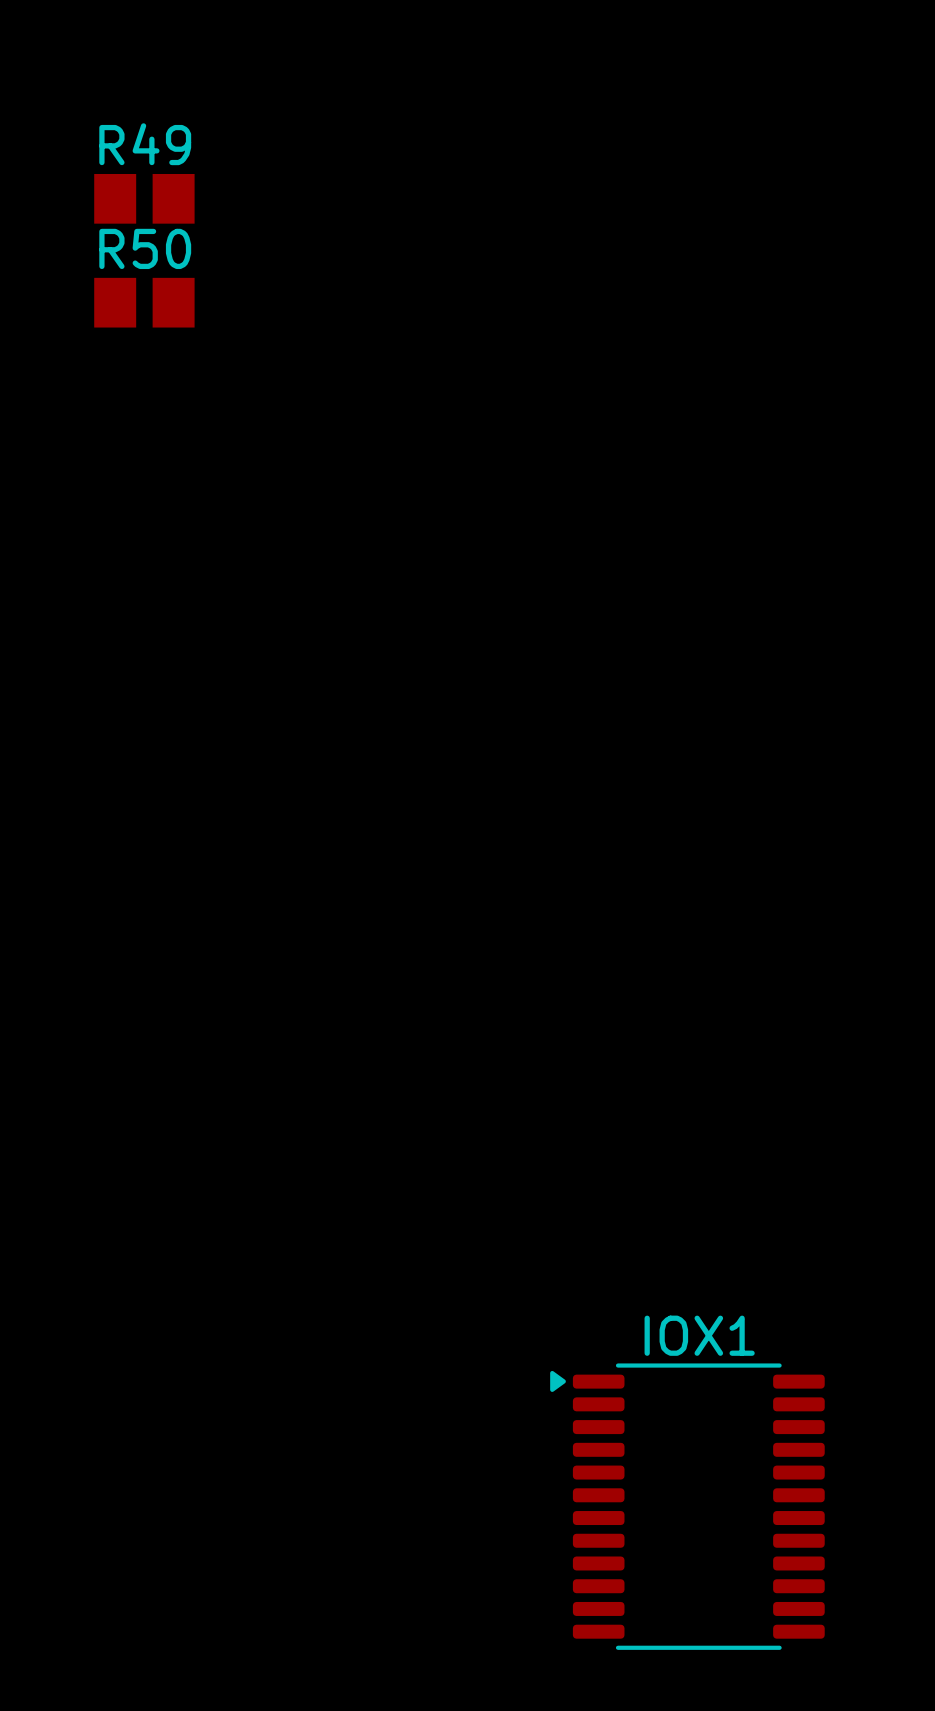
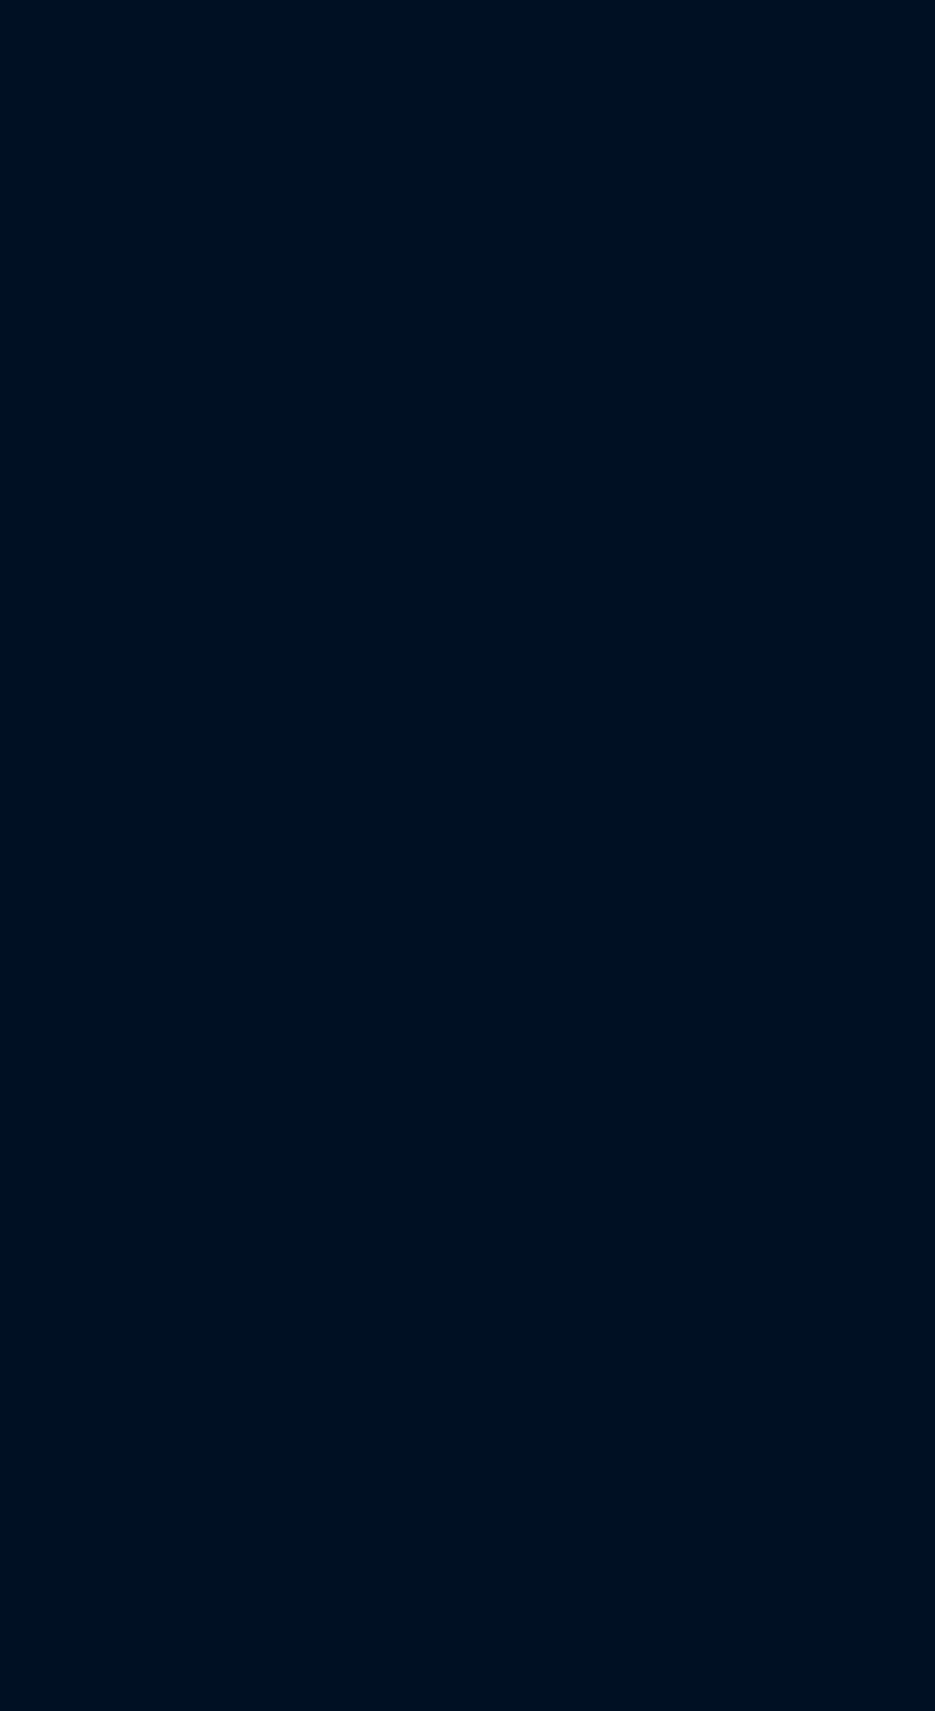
R49: (144, 198) -> none
R50: (144, 302) -> none
IOX1: (687, 1506) -> none

